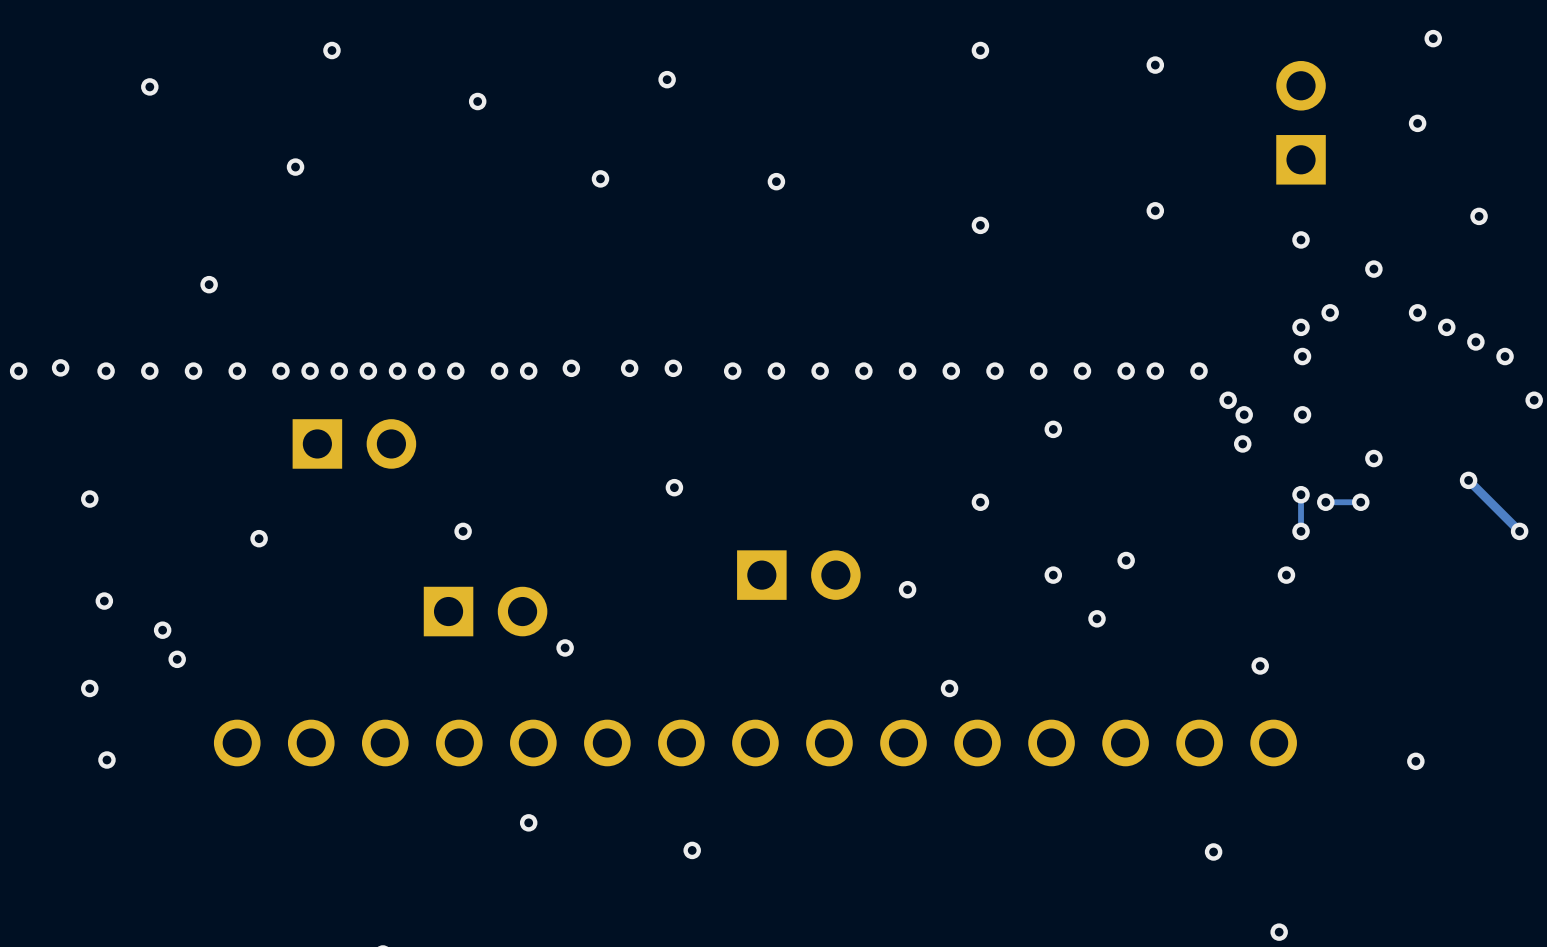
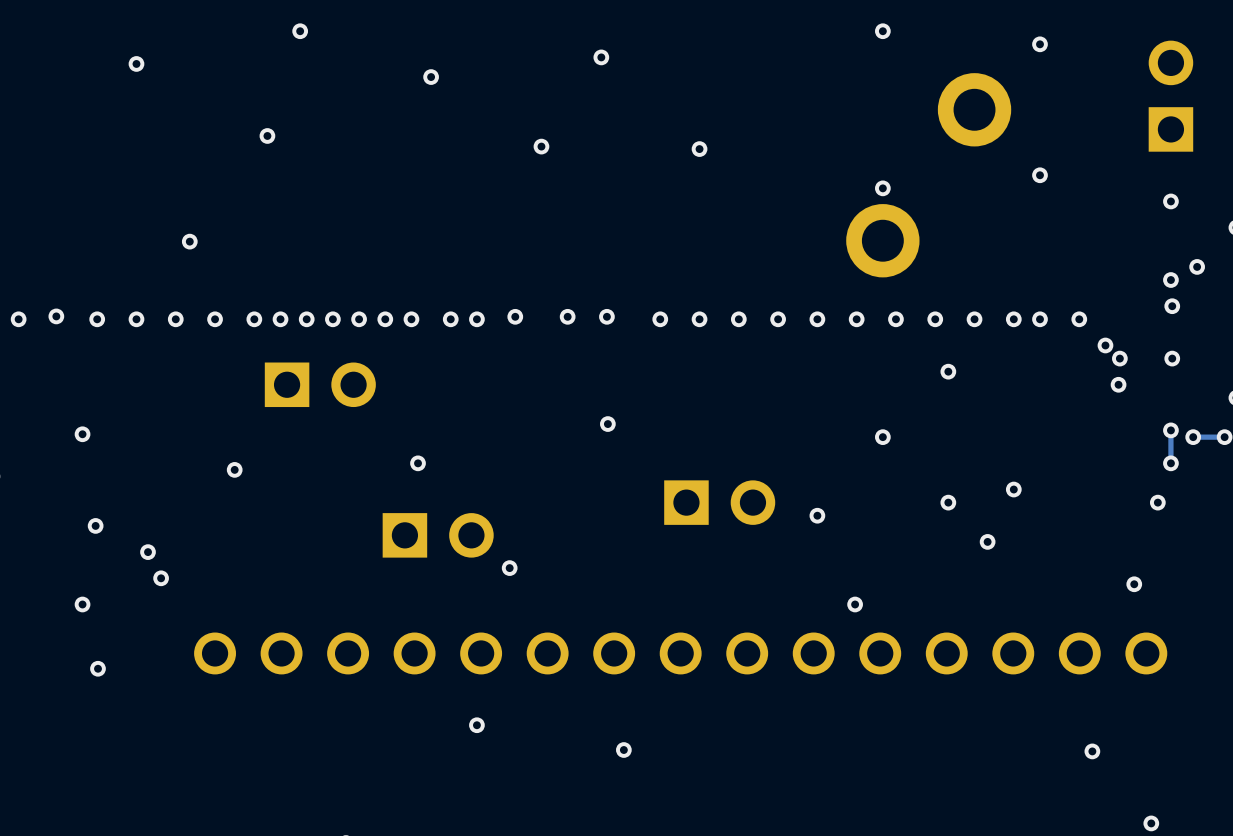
part: none -> (974, 109)
part: none -> (882, 240)

